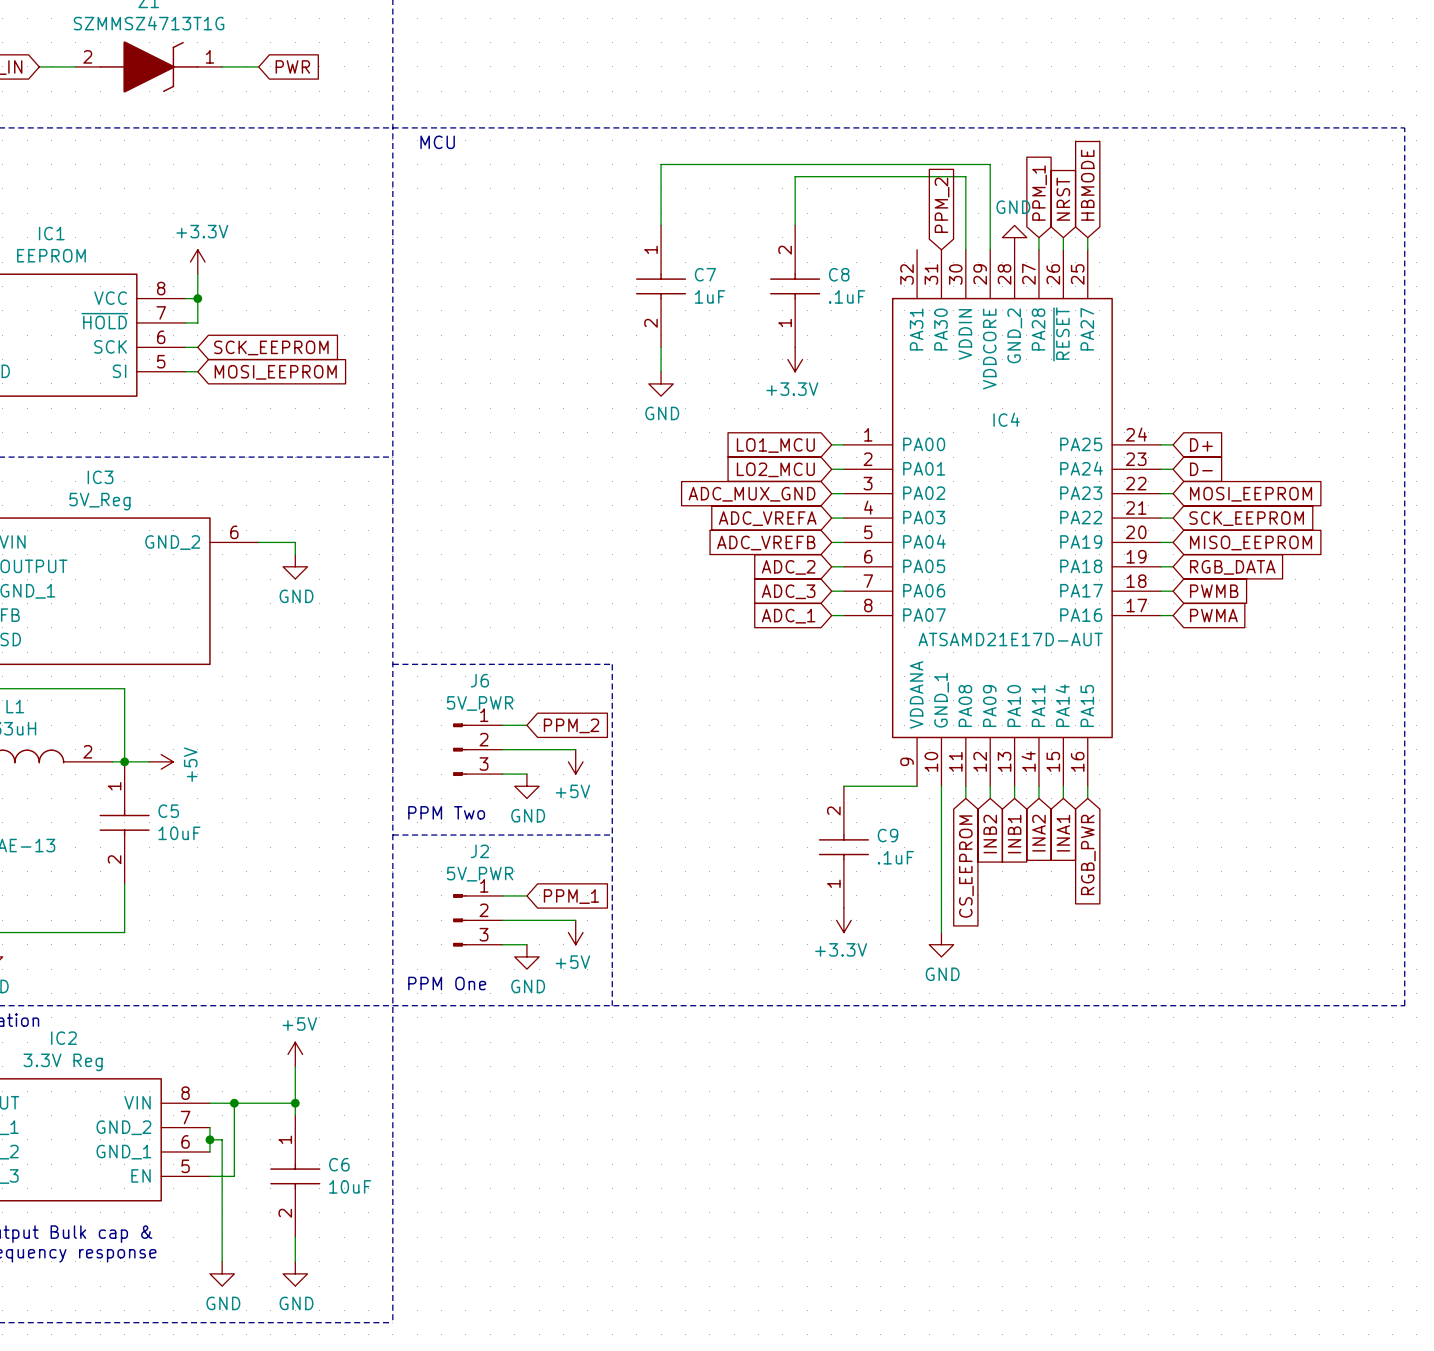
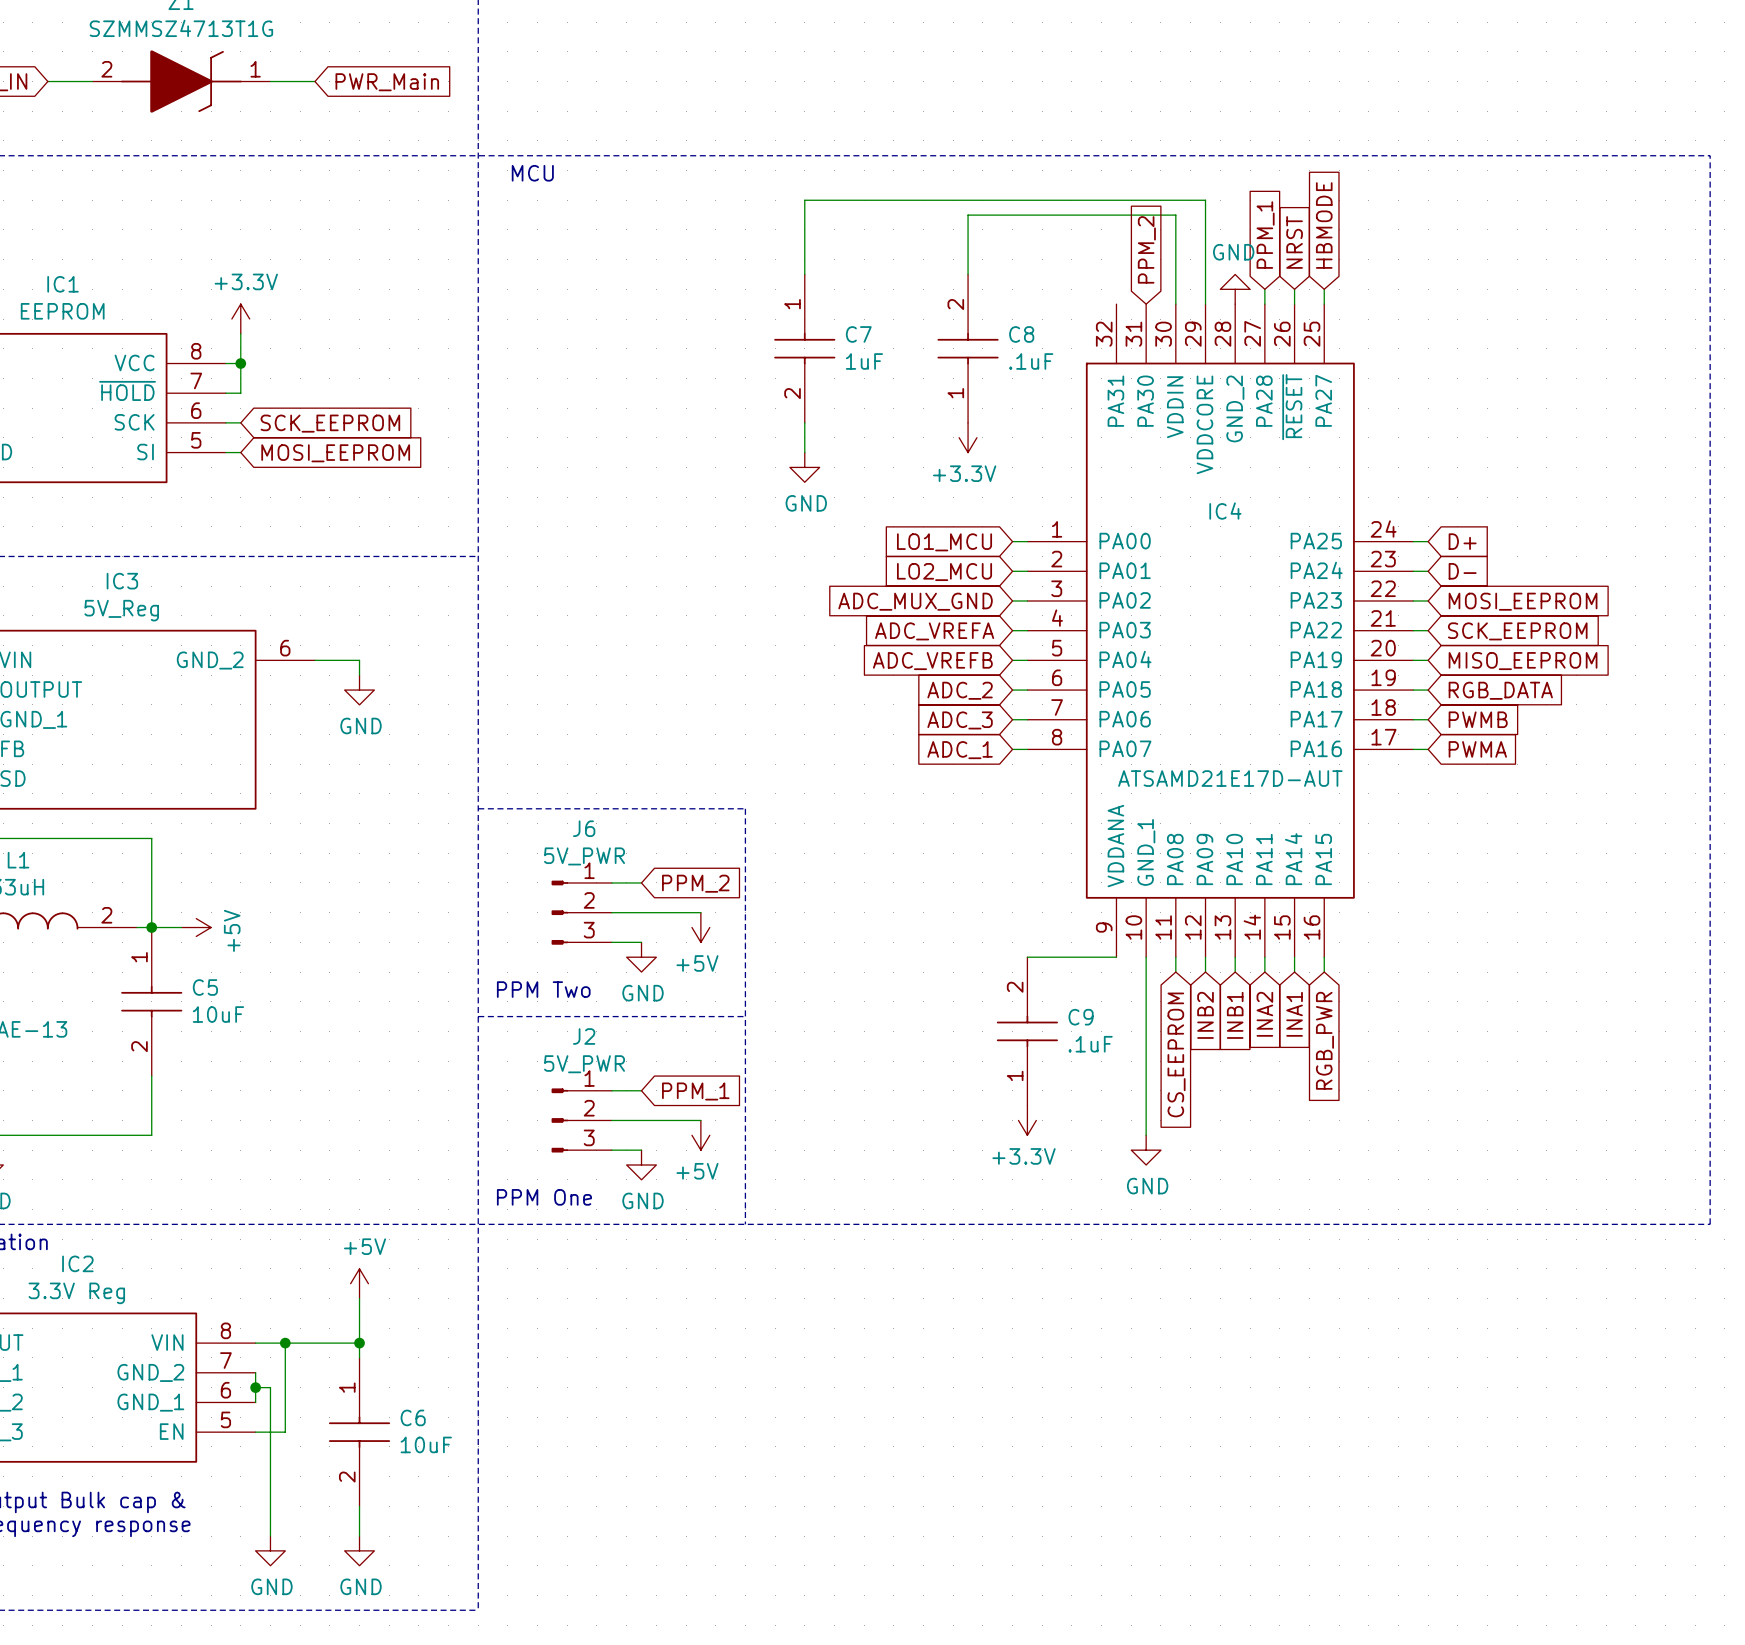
global label: PWR (292, 66) -> PWR_Main (387, 82)

